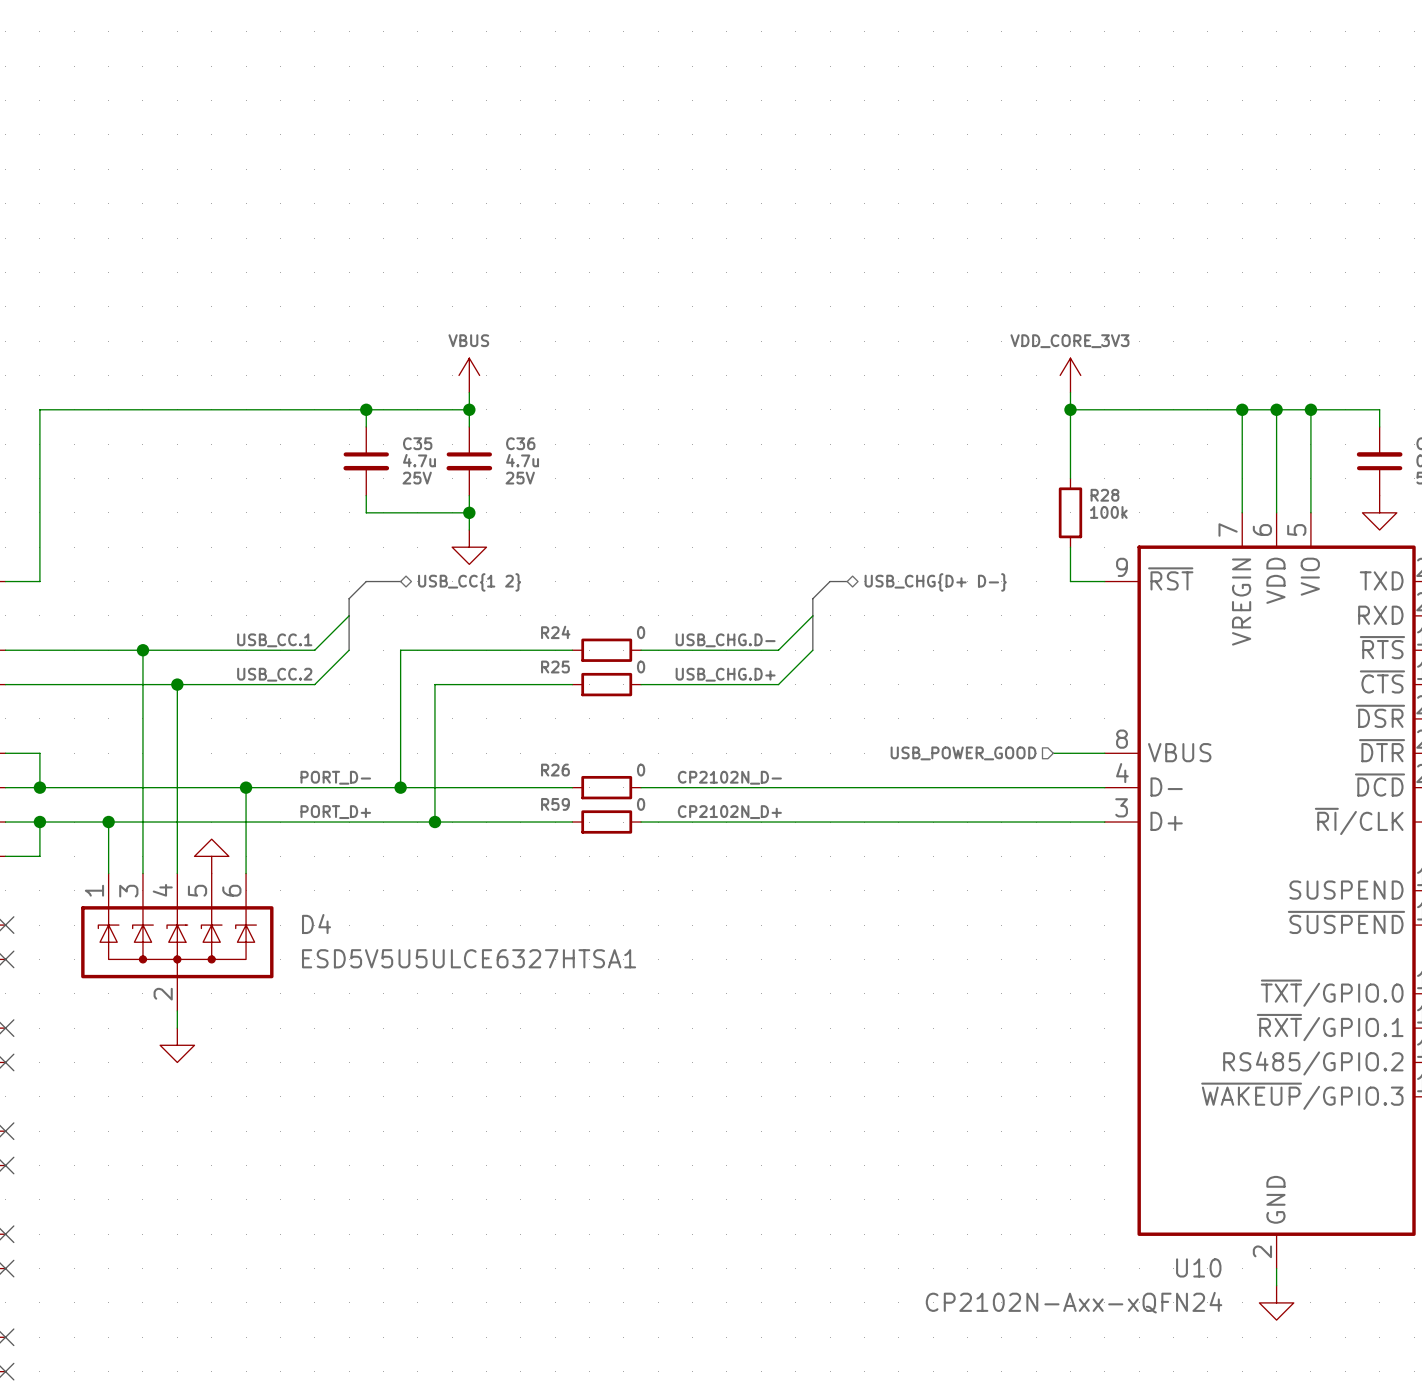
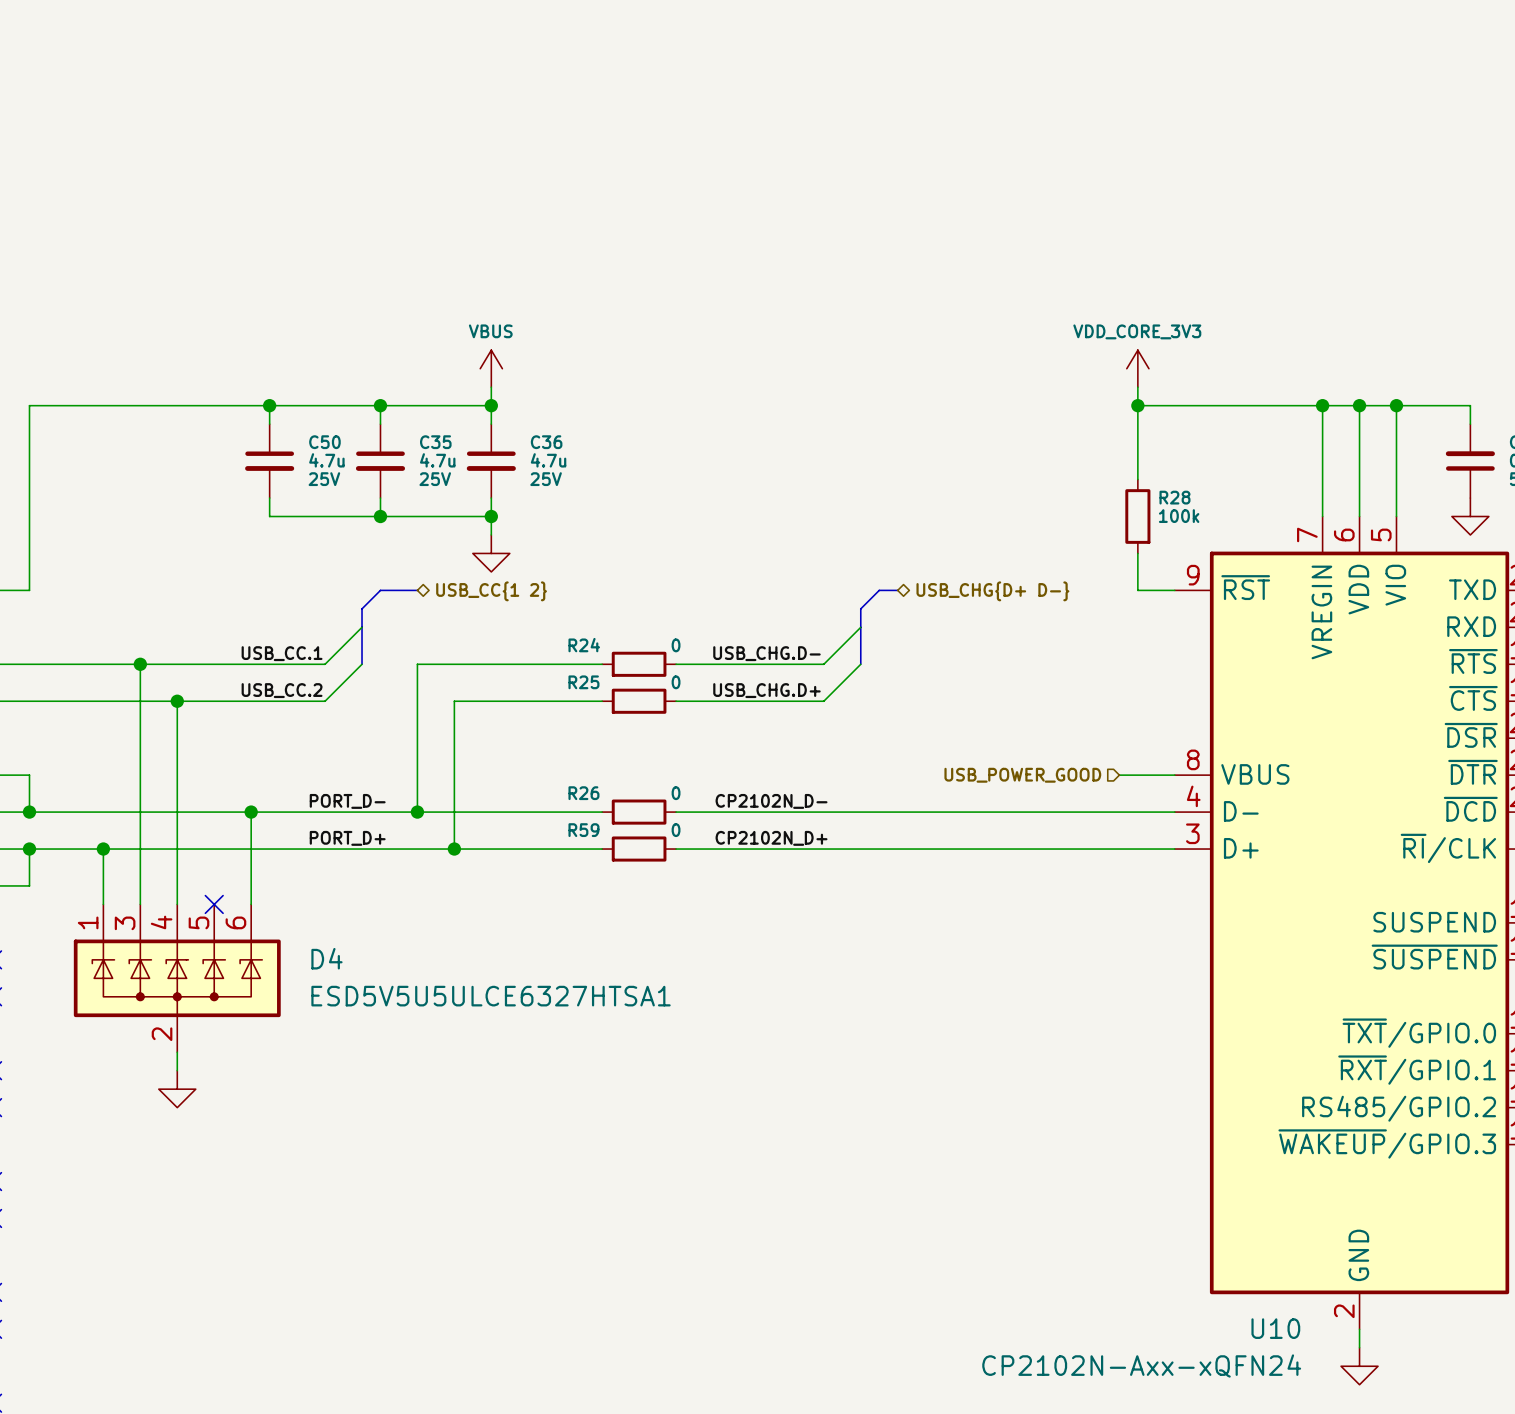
wire: none -> (269, 405) (269, 424)
junction: none -> (269, 405)
C50: none -> 4.7u (269, 461)
wire: none -> (269, 498) (269, 516) (380, 516)
junction: none -> (380, 516)
power symbol: (211, 856) -> none
no-connect mark: none -> (214, 904)

